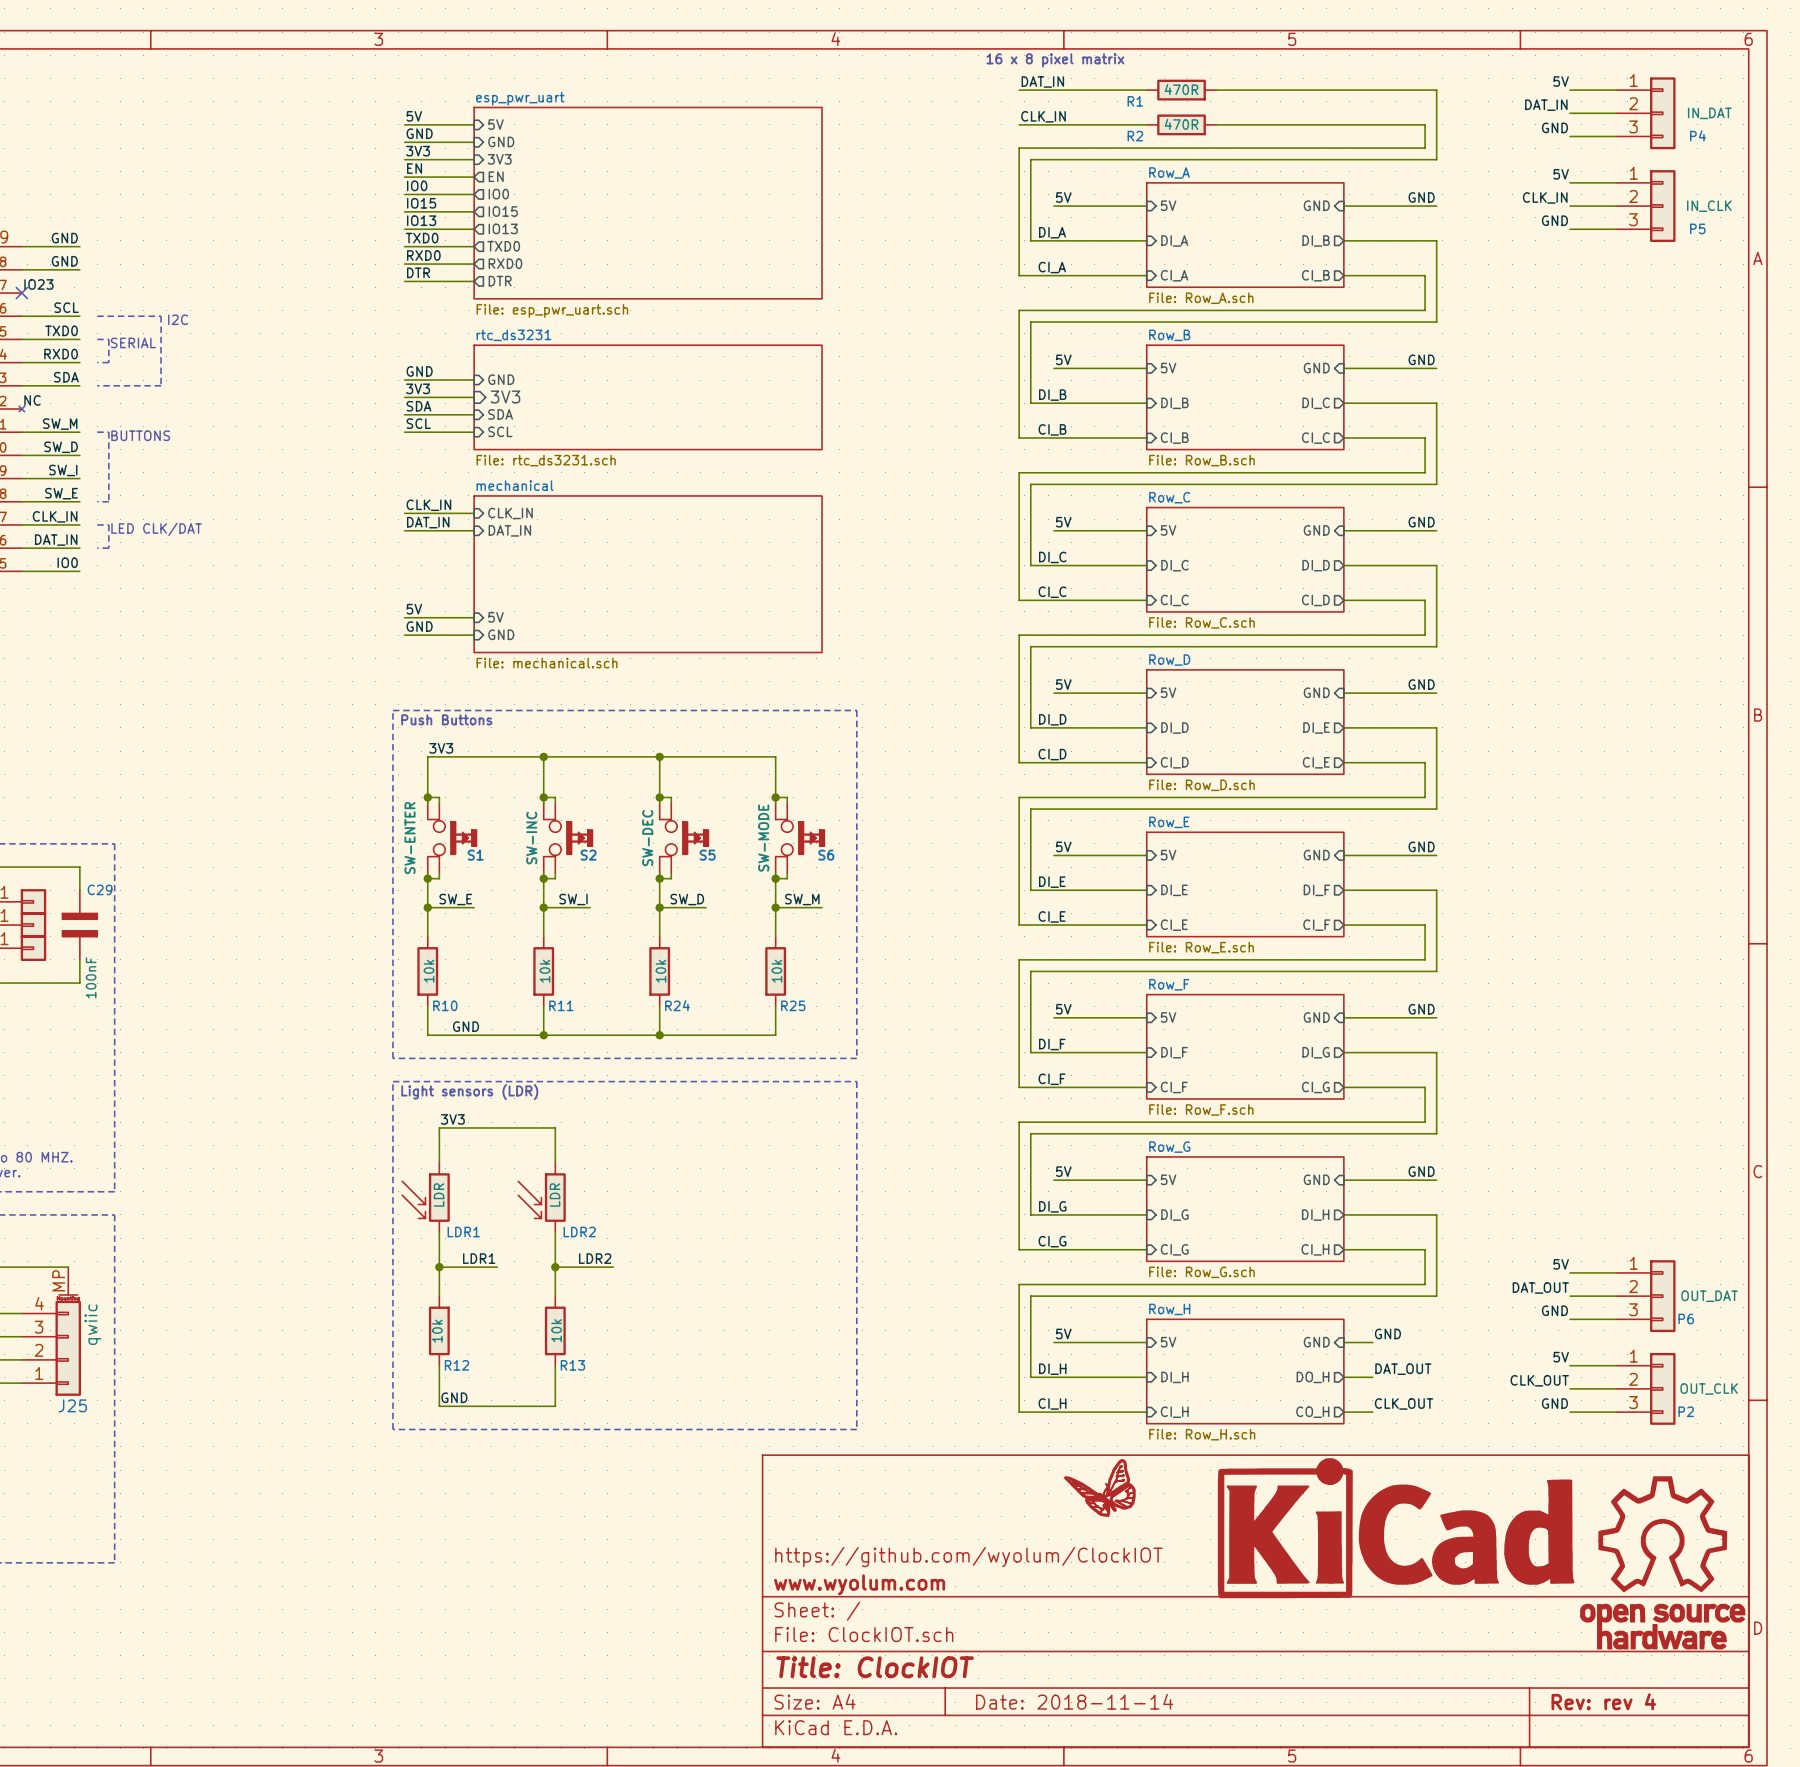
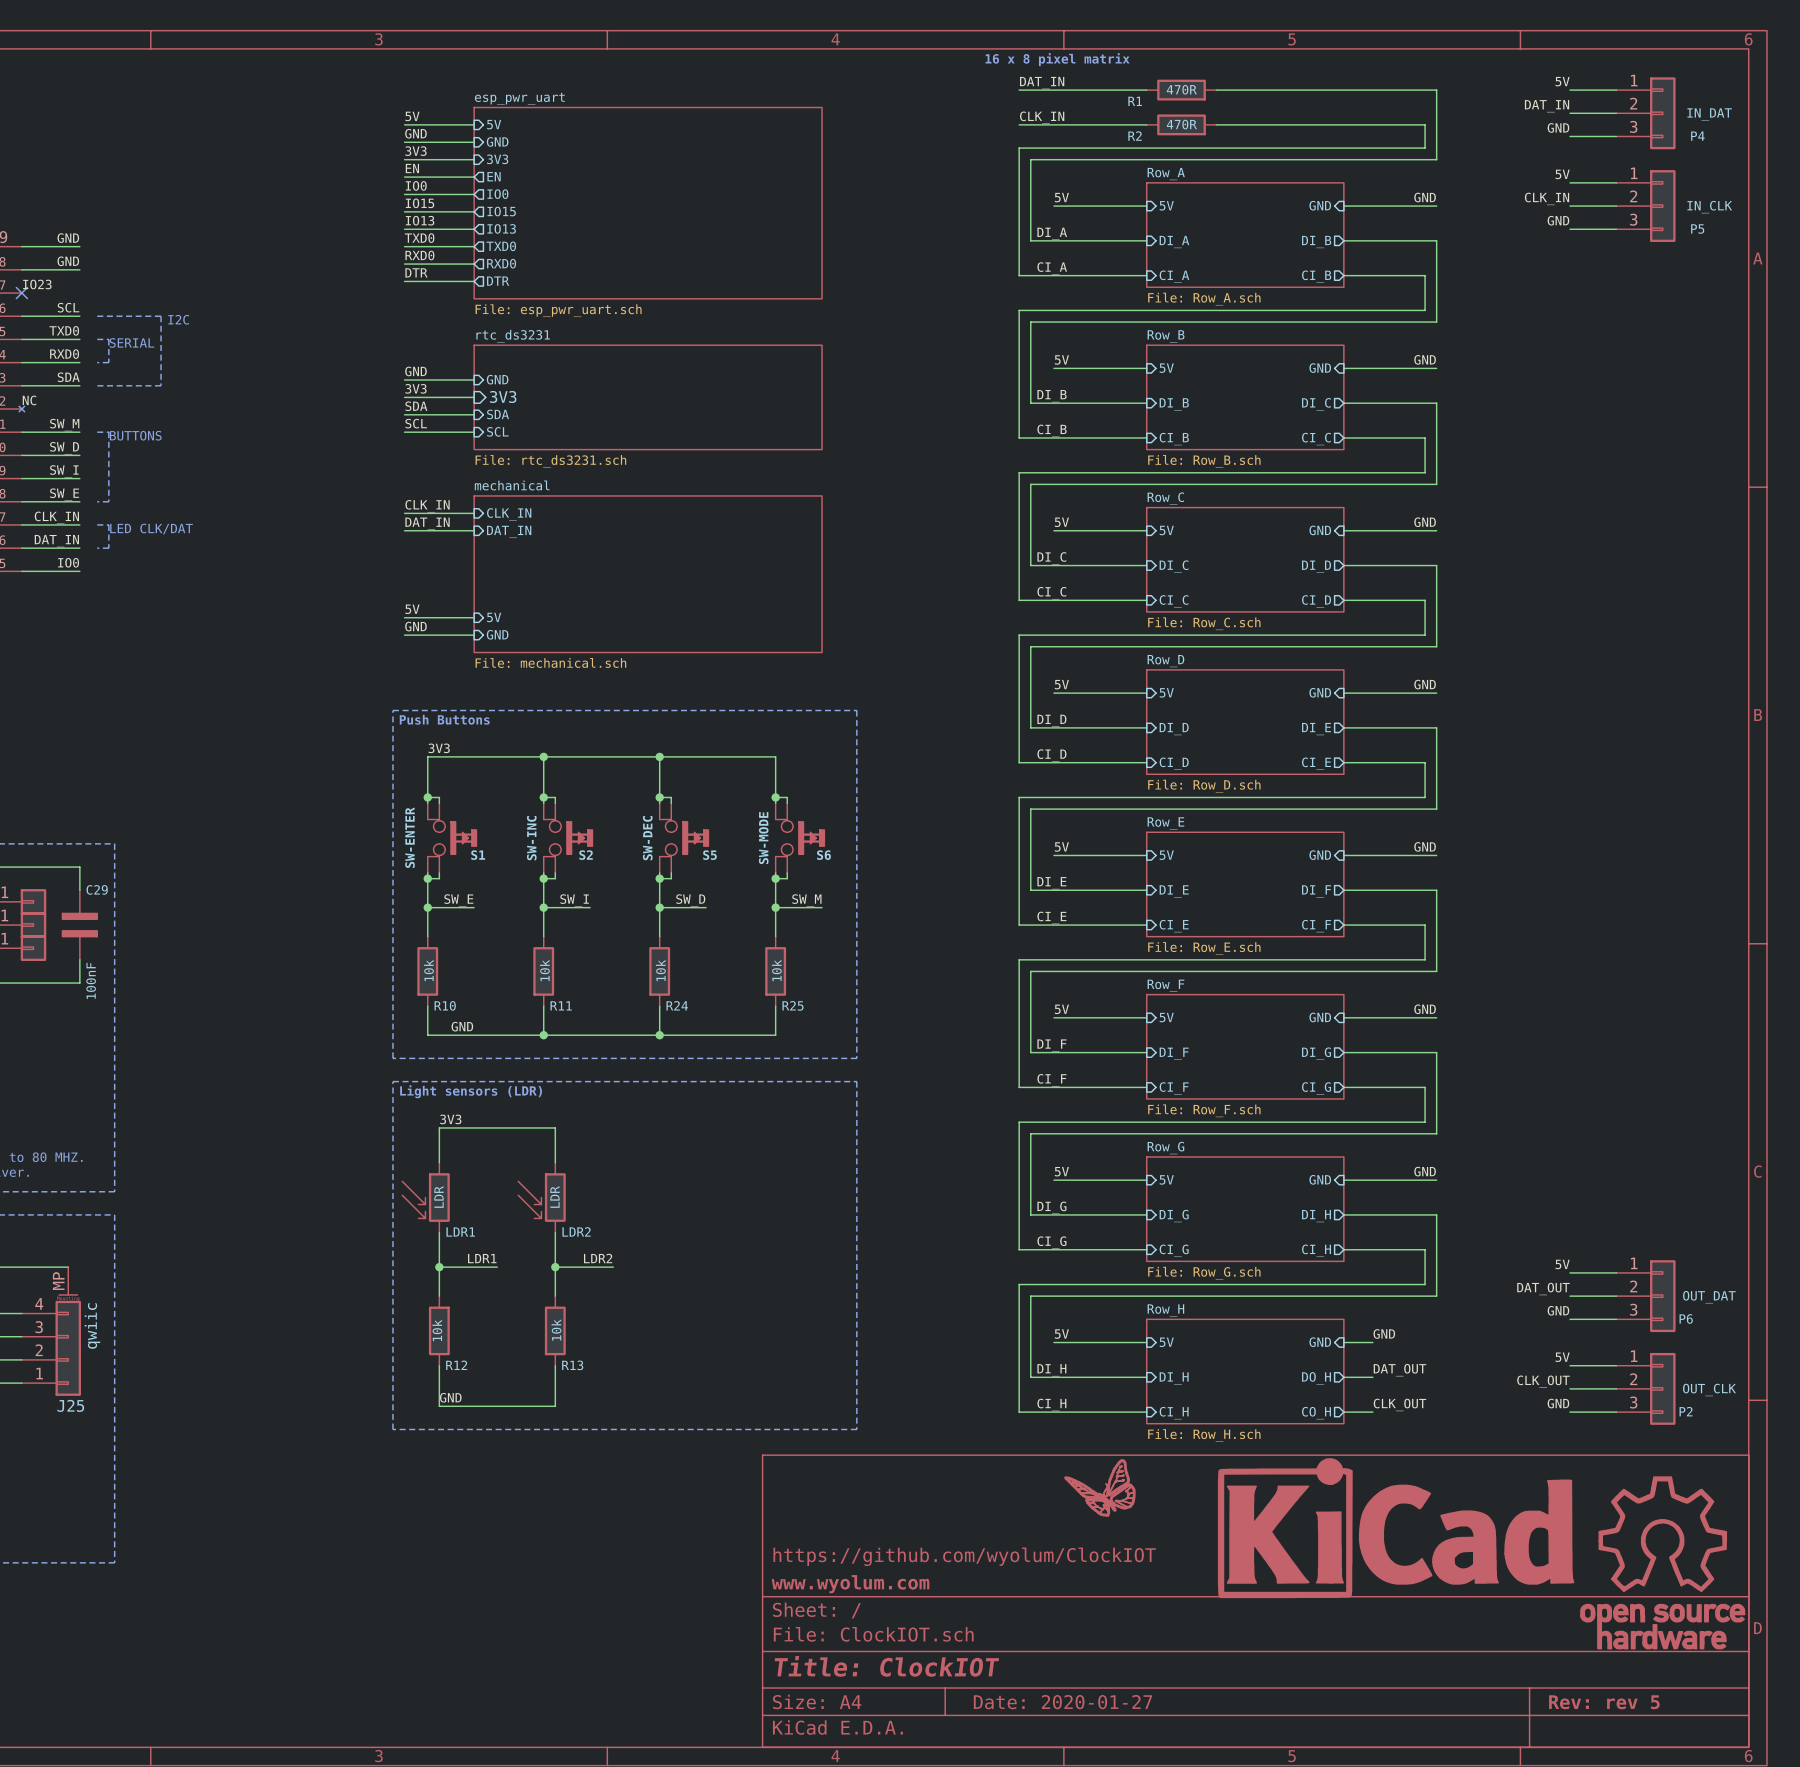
title block: Date: 2018-11-14 (1074, 1701) -> Date: 2020-01-27 (1062, 1702)
title block: Rev: rev 4 (1603, 1701) -> Rev: rev 5 (1604, 1702)

